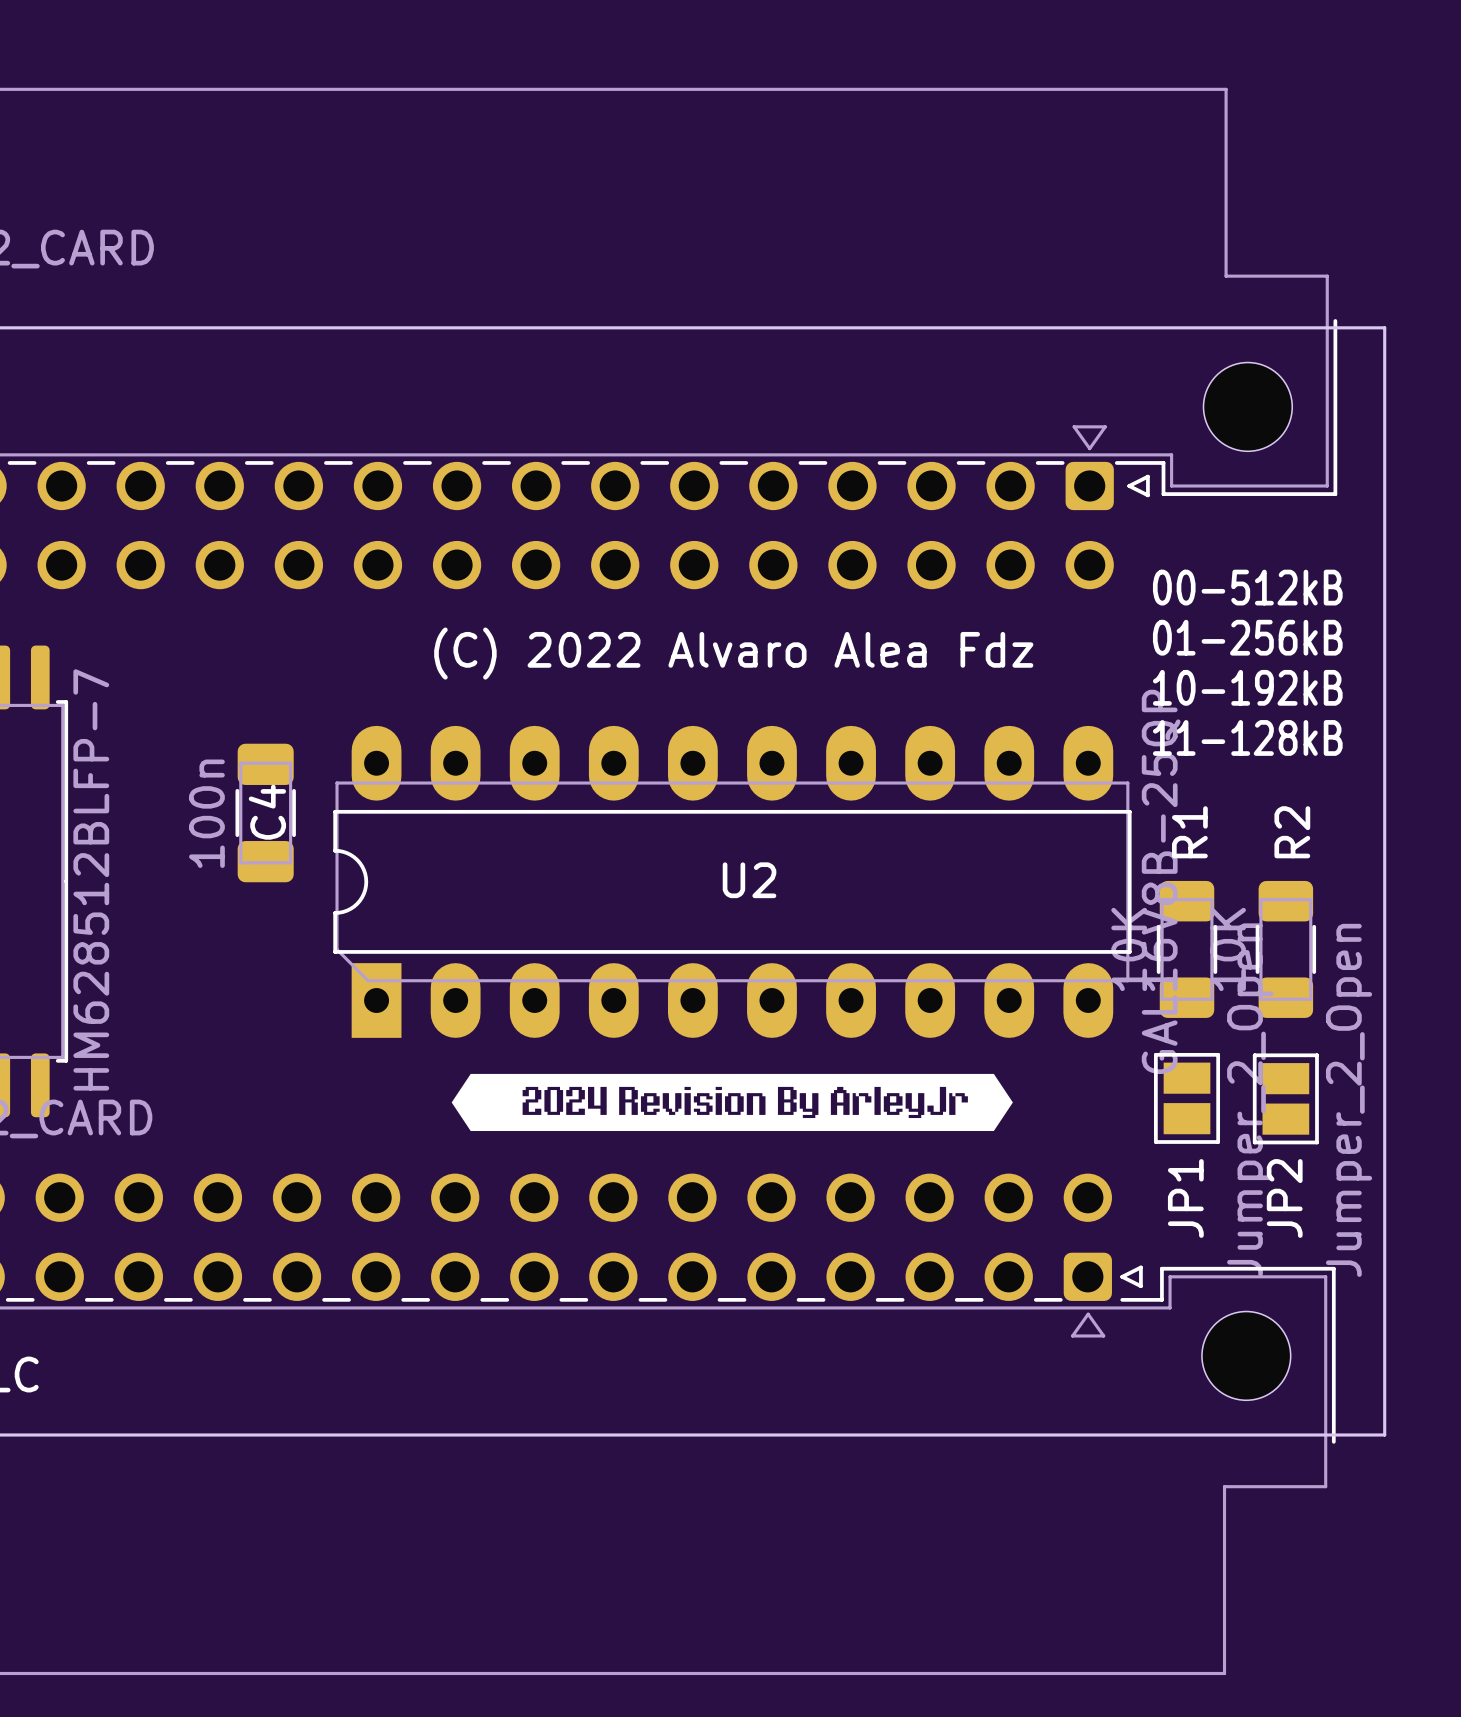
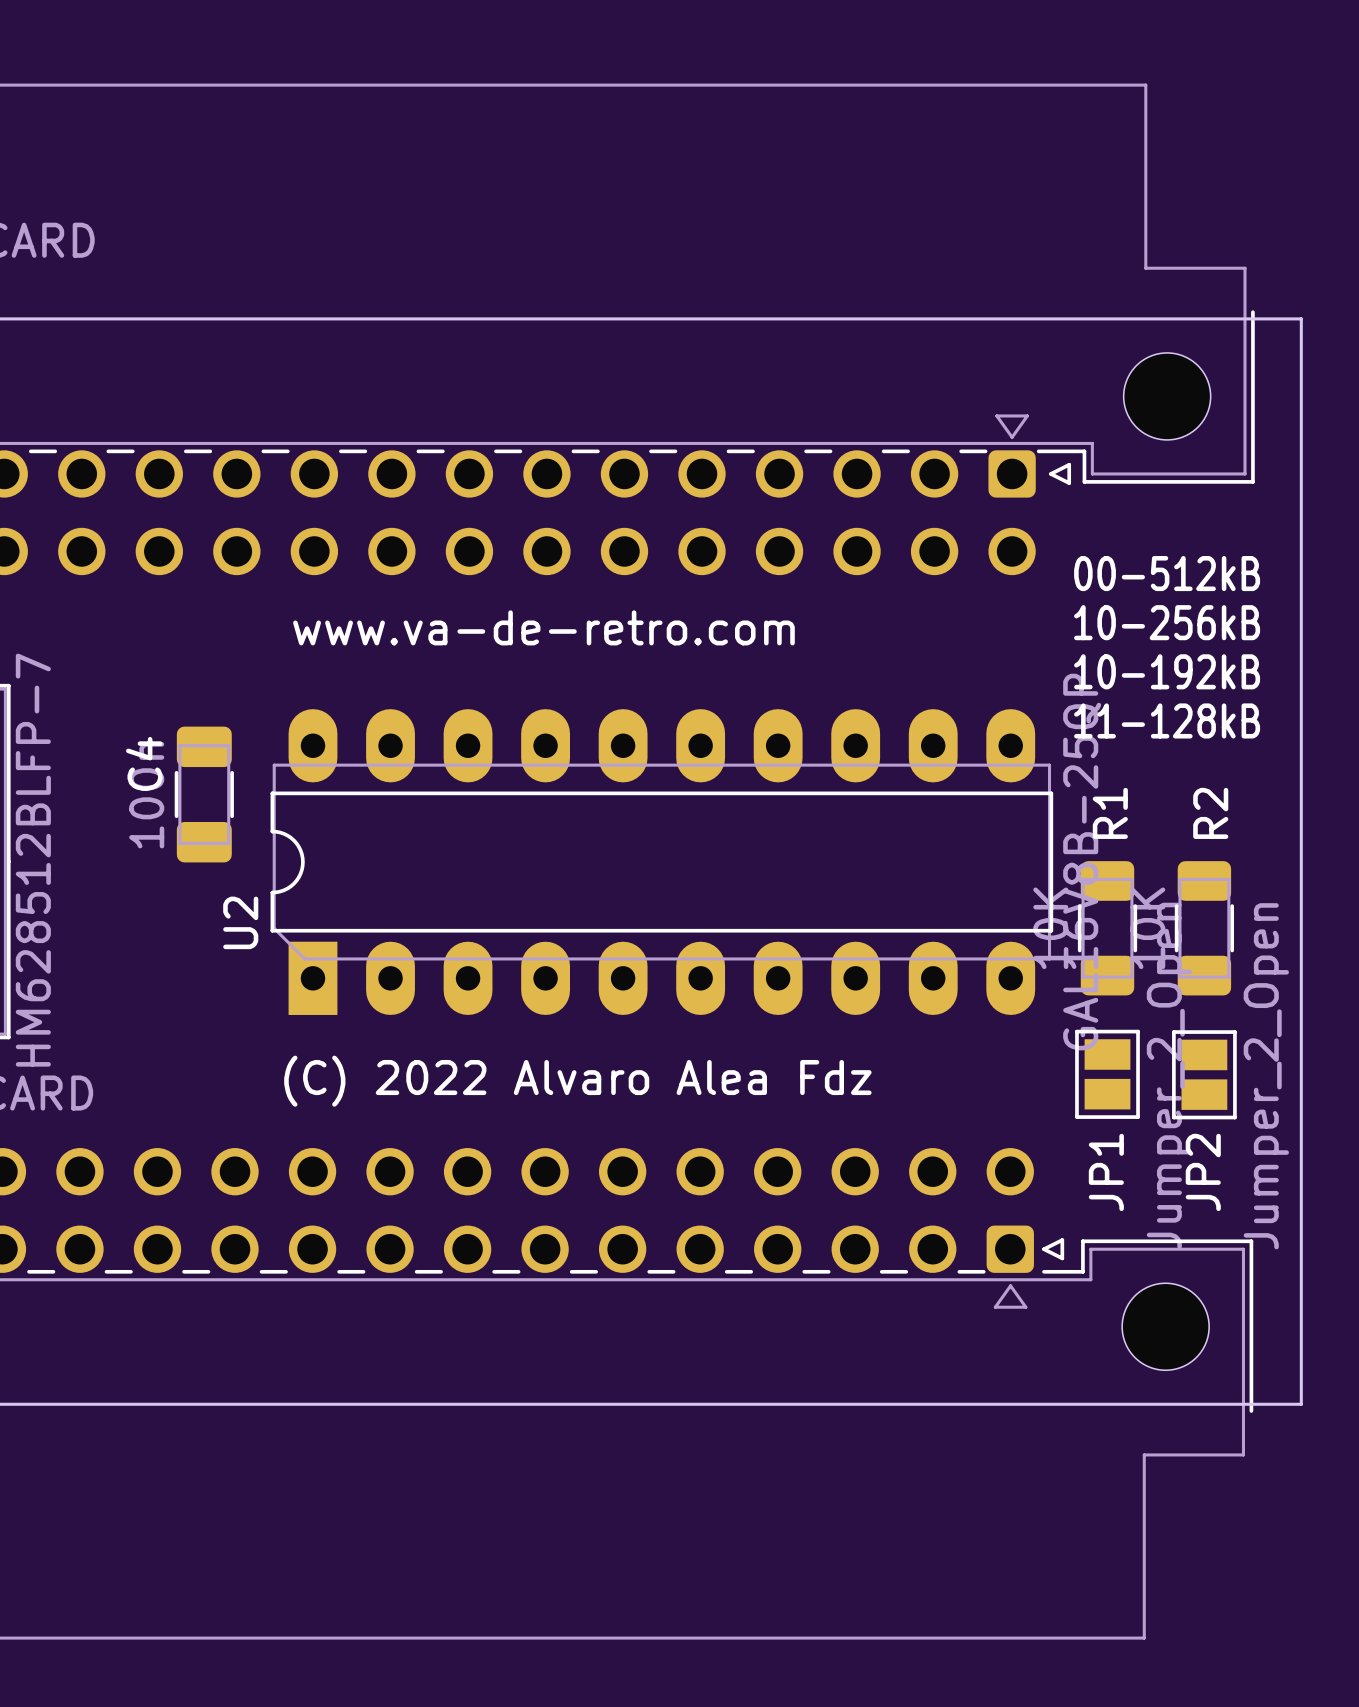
text: 01-256kB (1247, 637) -> 10-256kB (1167, 622)
text: none -> www.va-de-retro.com (543, 627)
text position: (C) 2022 Alvaro Alea Fdz (733, 653) -> (C) 2022 Alvaro Alea Fdz (577, 1081)
C4 name position: C4 (267, 812) -> C4 (144, 763)
U2 name rotation: 0° (749, 880) -> 90° counterclockwise (240, 922)
U2 name position: U2 (749, 880) -> U2 (240, 922)
drawing: [451, 1073, 1013, 1132] -> none

